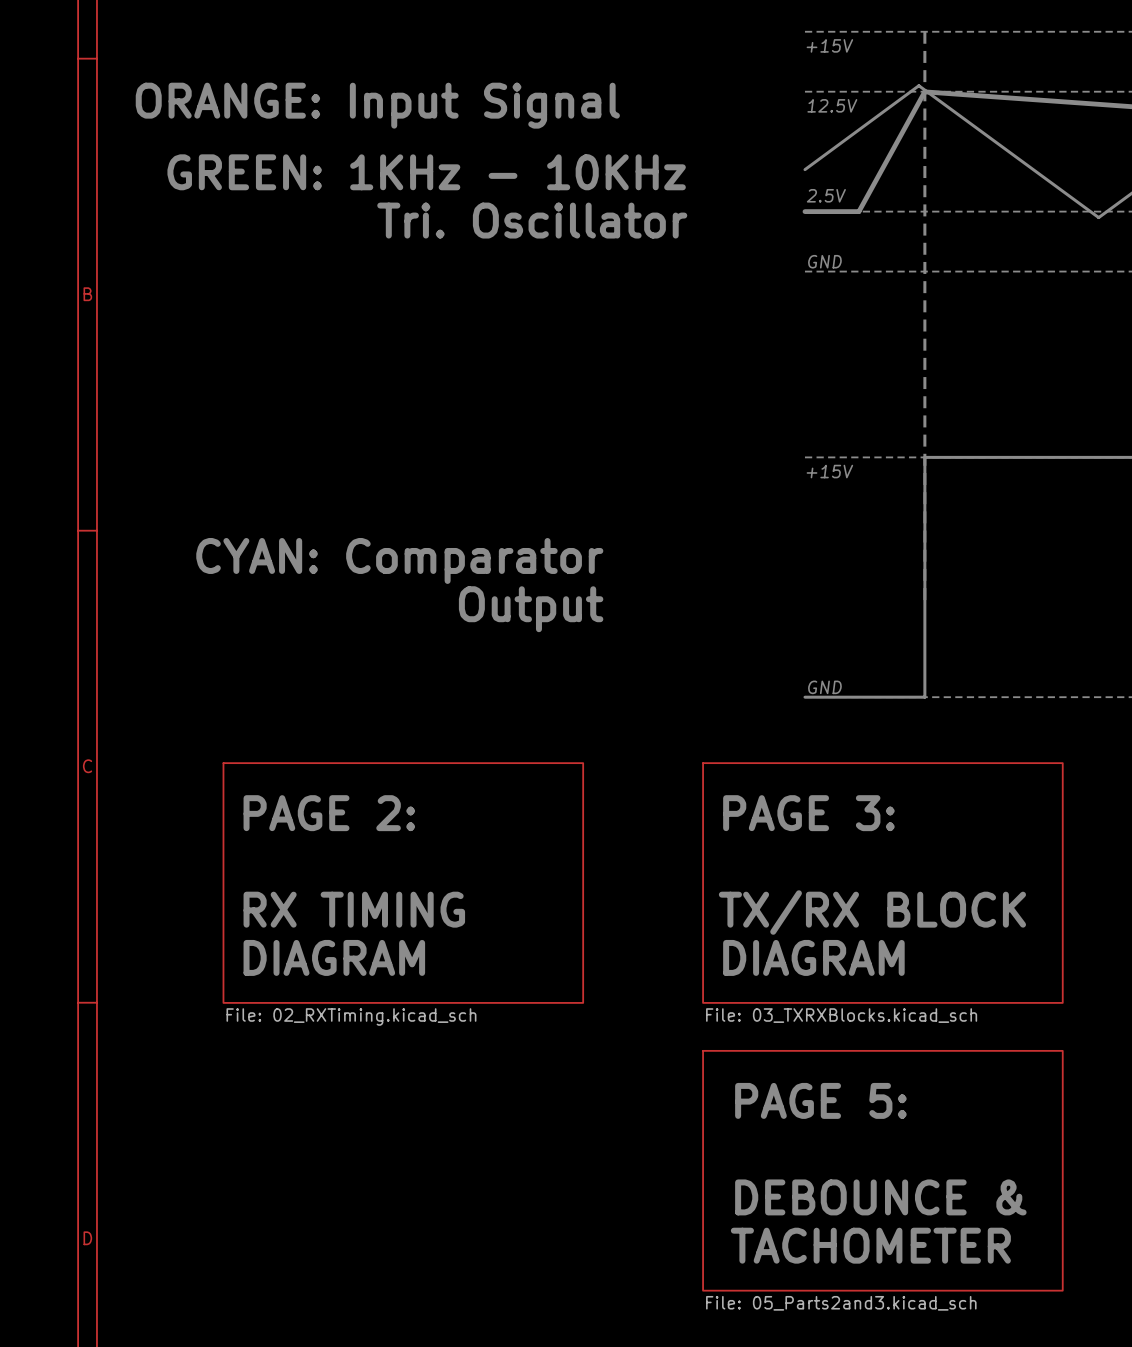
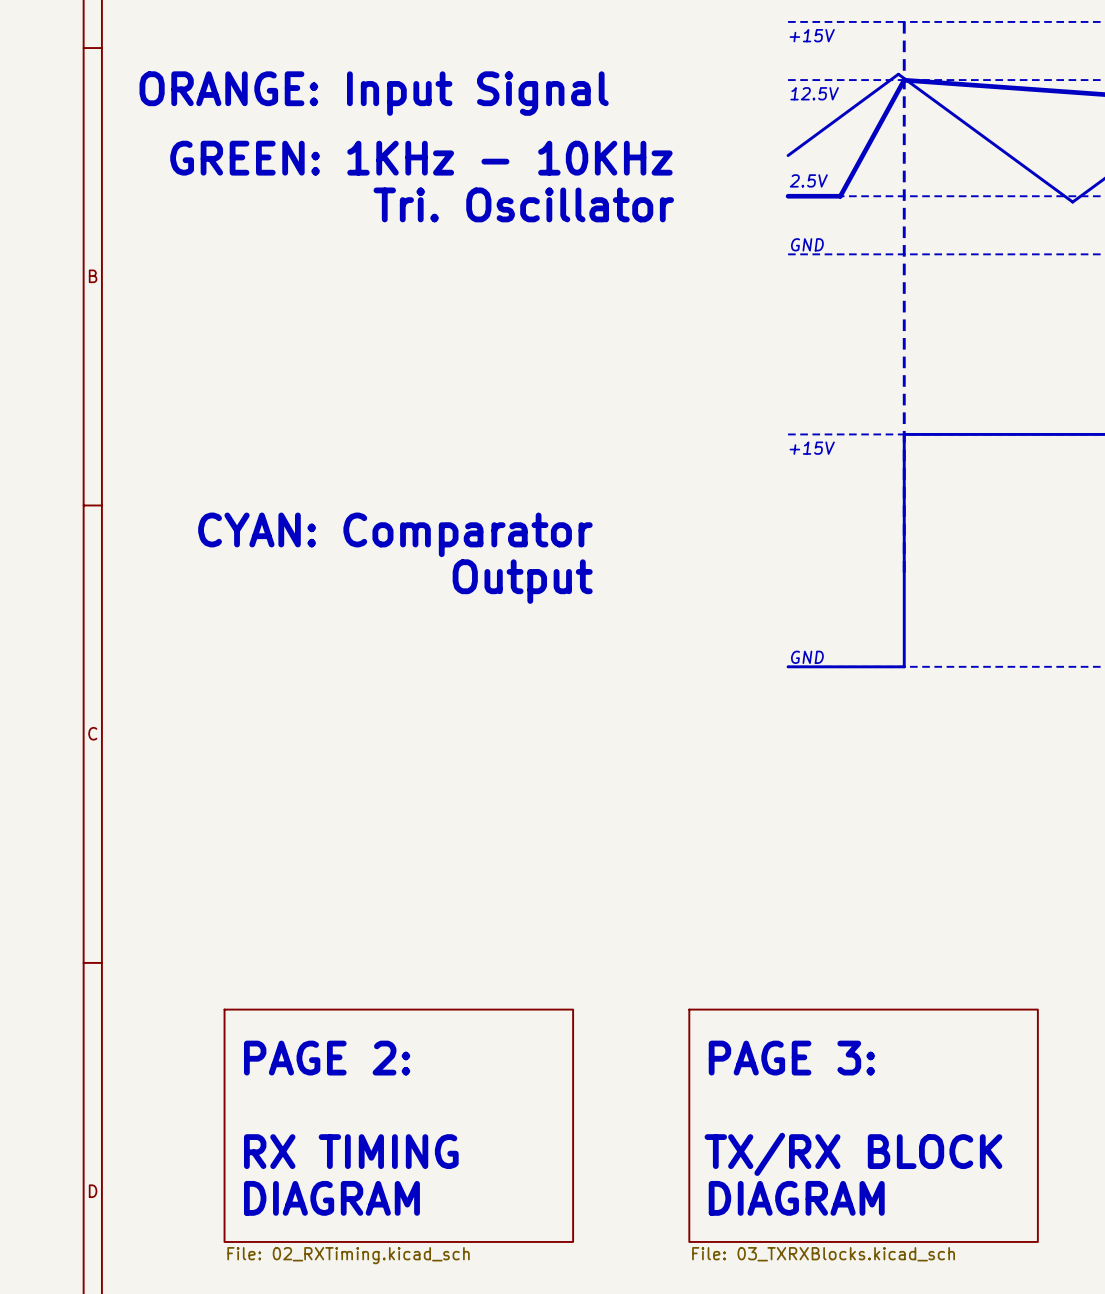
text: PAGE 2: (329, 813) -> none
text: PAGE 3: (808, 813) -> none
sheet: File: 02_RXTiming.kicad_sch (403, 883) -> none
sheet: File: 03_TXRXBlocks.kicad_sch (882, 883) -> none
text: RX TIMING (354, 909) -> none
text: TX/RX BLOCK (872, 912) -> none
text: DIAGRAM (334, 957) -> none
text: DIAGRAM (813, 957) -> none
text: none -> PAGE 2: (327, 1058)
text: PAGE 5: (820, 1100) -> PAGE 3: (791, 1058)
sheet: none -> File: 02_RXTiming.kicad_sch (398, 1125)
text: none -> RX TIMING (351, 1151)
text: DEBOUNCE & (880, 1197) -> none
text: none -> TX/RX BLOCK (853, 1154)
text: none -> DIAGRAM (331, 1198)
text: none -> DIAGRAM (796, 1198)
text: TACHOMETER (870, 1245) -> none
sheet value: File: 05_Parts2and3.kicad_sch (841, 1303) -> File: 03_TXRXBlocks.kicad_sch (823, 1254)

